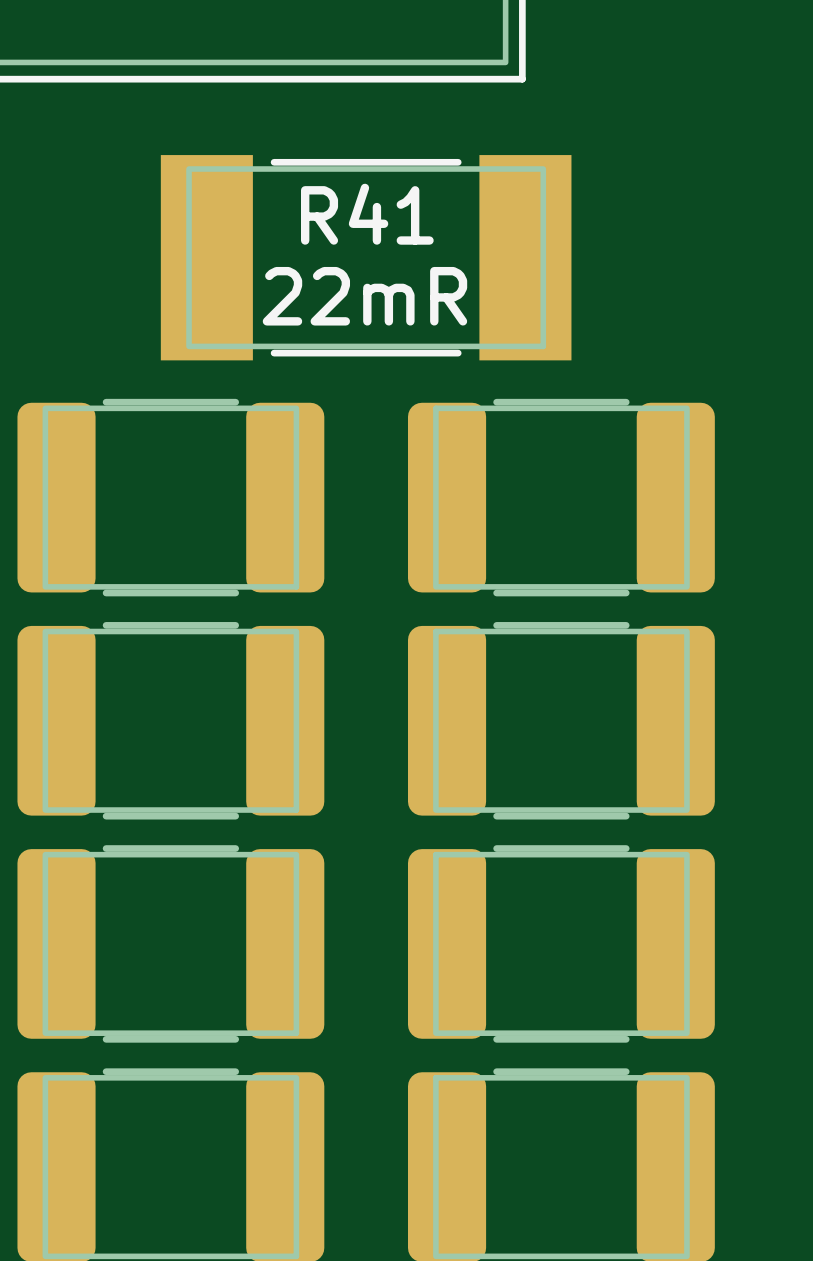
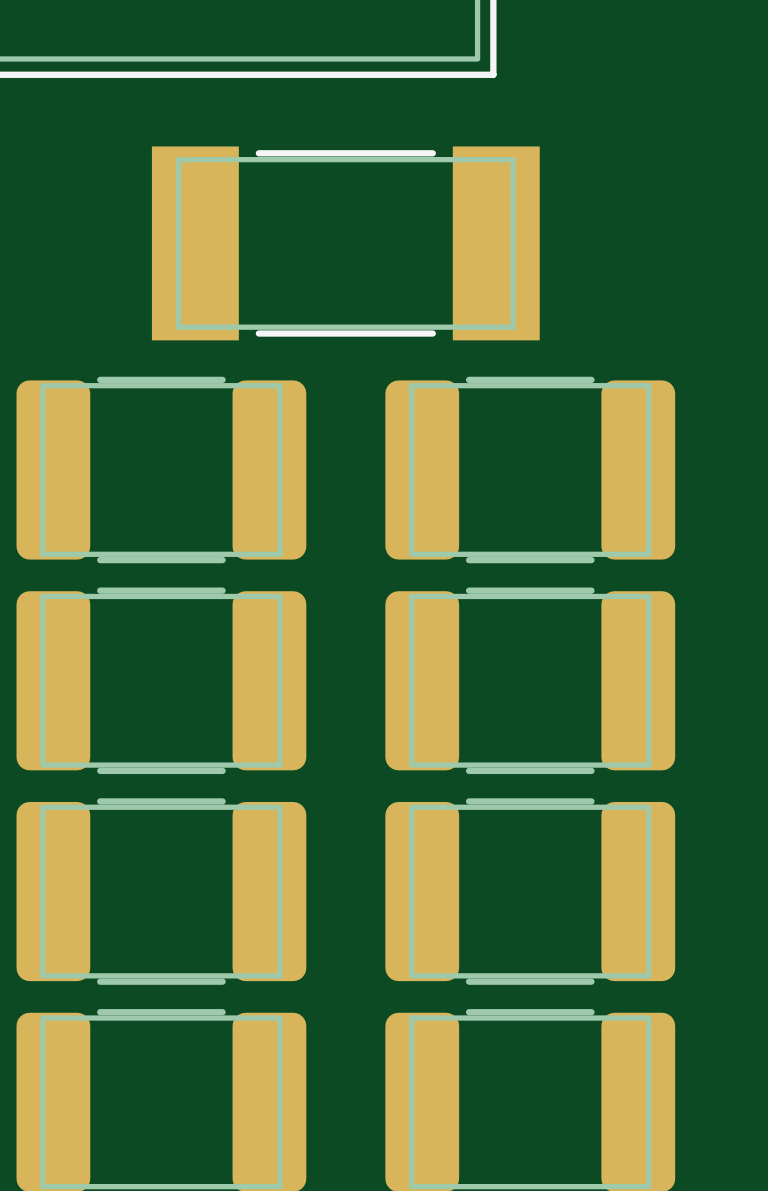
text: R41 (367, 214) -> none
text: 22mR (364, 296) -> none

